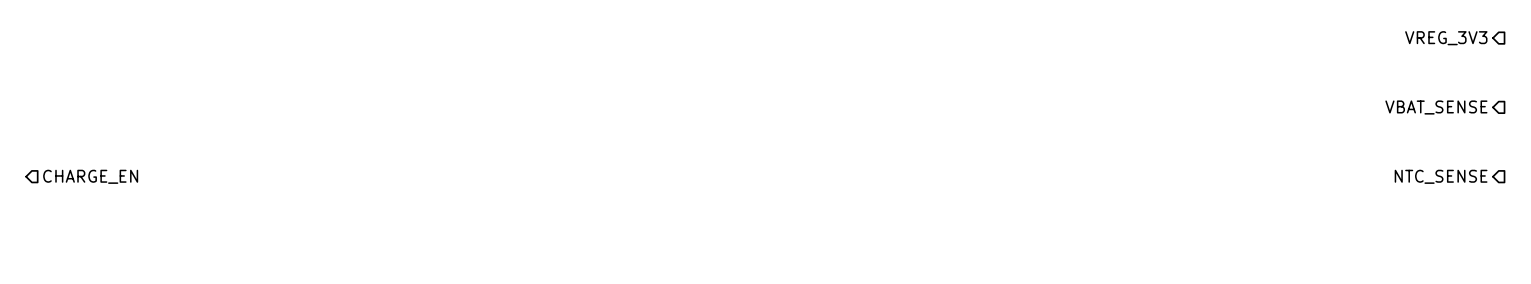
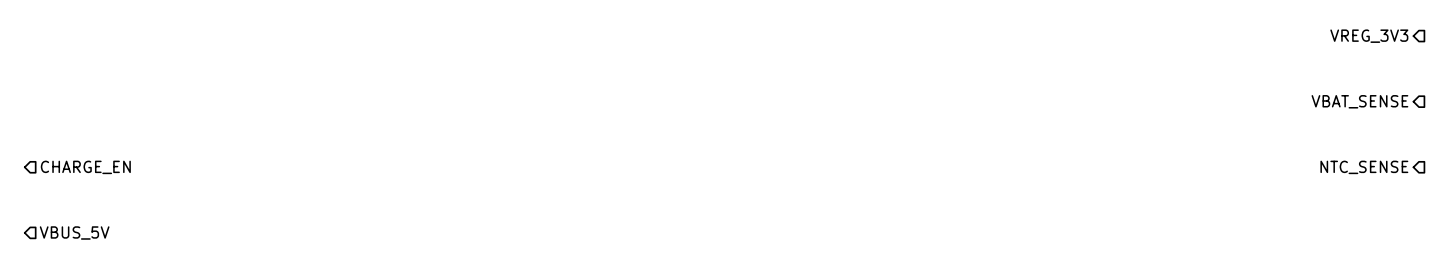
hierarchical label: none -> VBUS_5V (74, 233)

